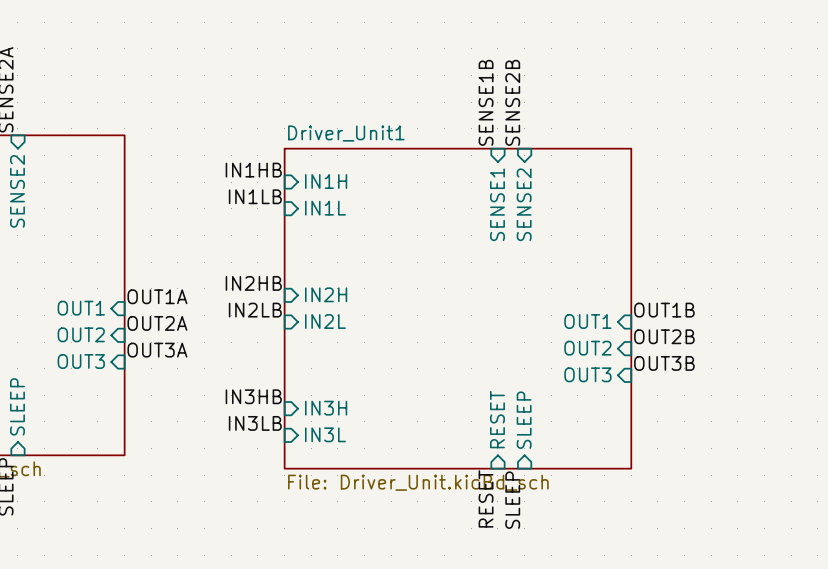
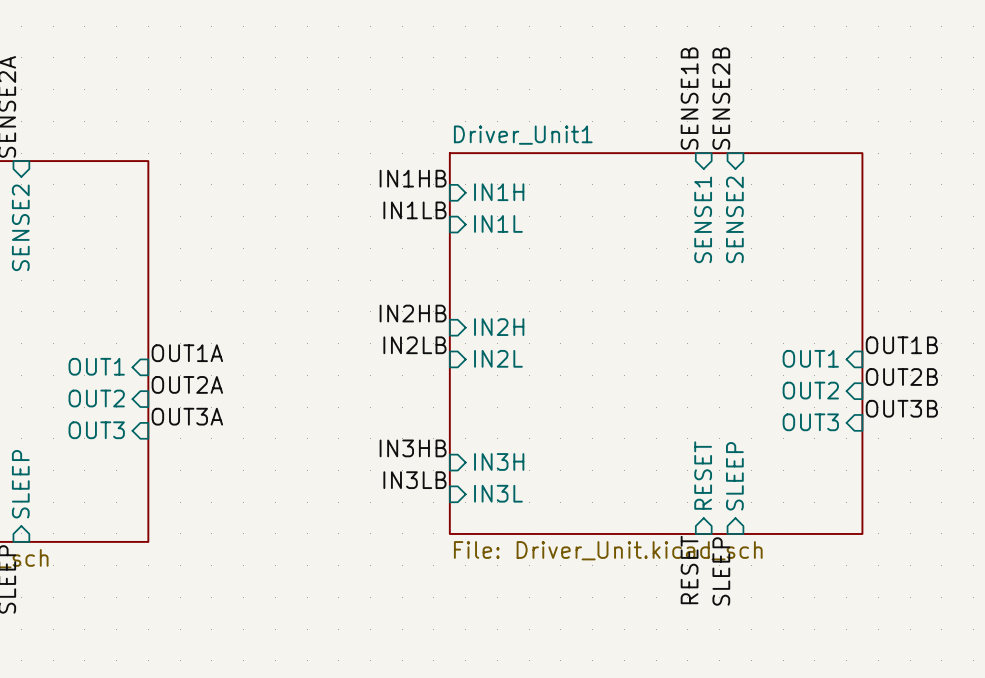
label position: SENSE1B (486, 102) -> SENSE1B (689, 98)
label position: SENSE2B (512, 102) -> SENSE2B (721, 98)
label position: IN1HB (253, 170) -> IN1HB (413, 178)
sheet pin position: IN1H (326, 181) -> IN1H (499, 192)
label position: IN1LB (255, 196) -> IN1LB (414, 210)
sheet pin position: SENSE1 (497, 204) -> SENSE1 (703, 219)
sheet pin position: SENSE2 (524, 204) -> SENSE2 (734, 219)
sheet pin position: IN1L (325, 208) -> IN1L (498, 223)
label position: IN2HB (253, 283) -> IN2HB (413, 313)
sheet pin position: IN2H (326, 294) -> IN2H (499, 327)
sheet Driver_Unit1 position: (457, 308) -> (656, 343)
label position: IN2LB (255, 310) -> IN2LB (414, 345)
label position: OUT1B (664, 310) -> OUT1B (901, 345)
sheet pin position: IN2L (325, 321) -> IN2L (498, 358)
sheet pin position: OUT1 (587, 321) -> OUT1 (810, 358)
label position: OUT2B (664, 336) -> OUT2B (901, 377)
sheet pin position: OUT2 (587, 348) -> OUT2 (810, 390)
label position: OUT3B (664, 363) -> OUT3B (901, 408)
sheet pin position: OUT3 (587, 374) -> OUT3 (810, 422)
label position: IN3HB (253, 396) -> IN3HB (413, 448)
sheet pin position: IN3H (326, 408) -> IN3H (499, 461)
sheet pin position: RESET (497, 419) -> RESET (703, 475)
sheet pin position: SLEEP (524, 420) -> SLEEP (734, 476)
label position: IN3LB (255, 423) -> IN3LB (414, 480)
sheet pin position: IN3L (325, 434) -> IN3L (498, 493)
sheet Driver_Unit1 value: File: Driver_Unit.kicBd_sch (418, 482) -> File: Driver_Unit.kicad_sch (608, 550)
label position: RESET (486, 498) -> RESET (689, 569)
label position: SLEEP (512, 500) -> SLEEP (721, 571)

